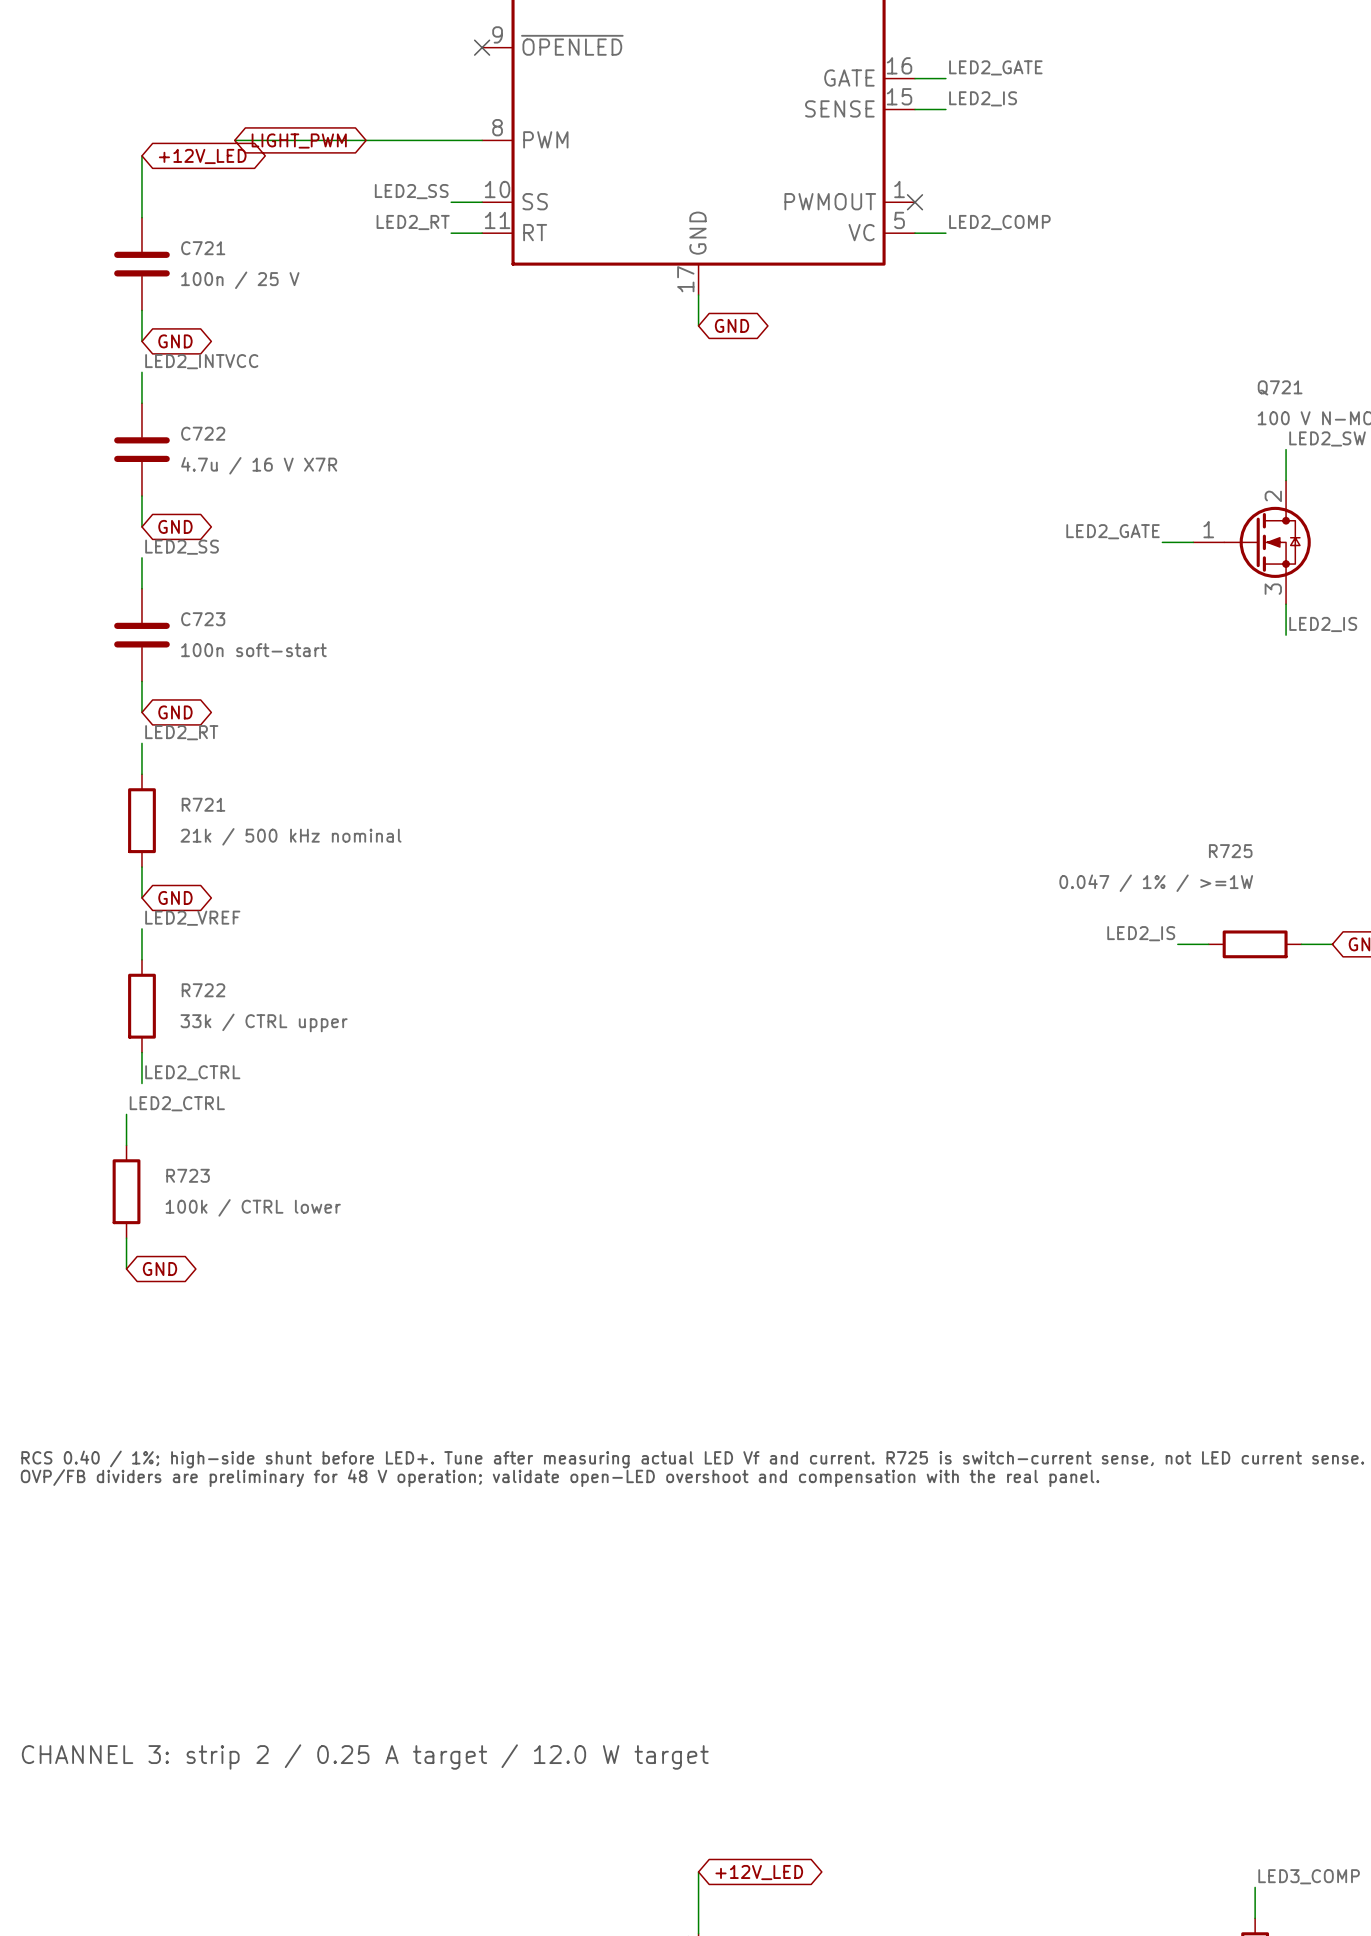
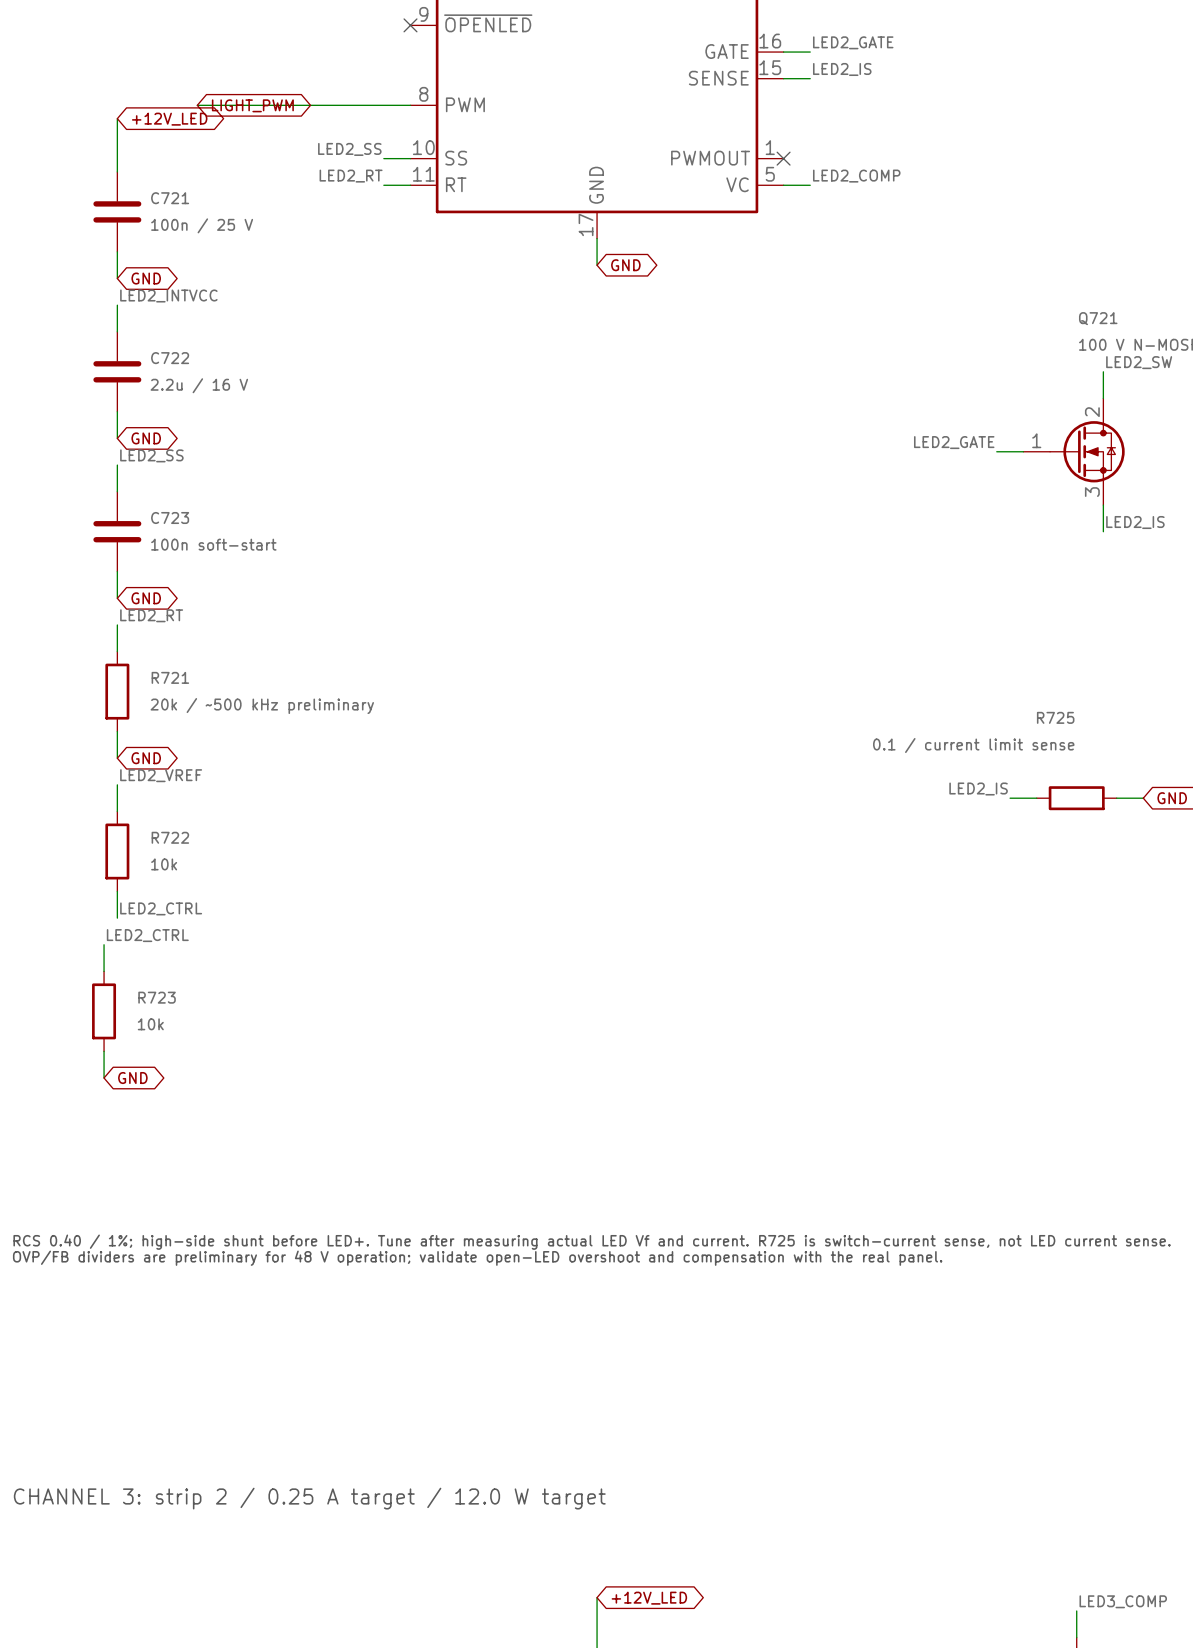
C722 value: 4.7u / 16 V X7R (259, 465) -> 2.2u / 16 V (199, 385)
R721 value: 21k / 500 kHz nominal (291, 836) -> 20k / ~500 kHz preliminary (262, 706)
R725 value: 0.047 / 1% / >=1W (1156, 883) -> 0.1 / current limit sense (973, 745)
R722 value: 33k / CTRL upper (264, 1022) -> 10k (164, 864)
R723 value: 100k / CTRL lower (253, 1207) -> 10k (150, 1024)

